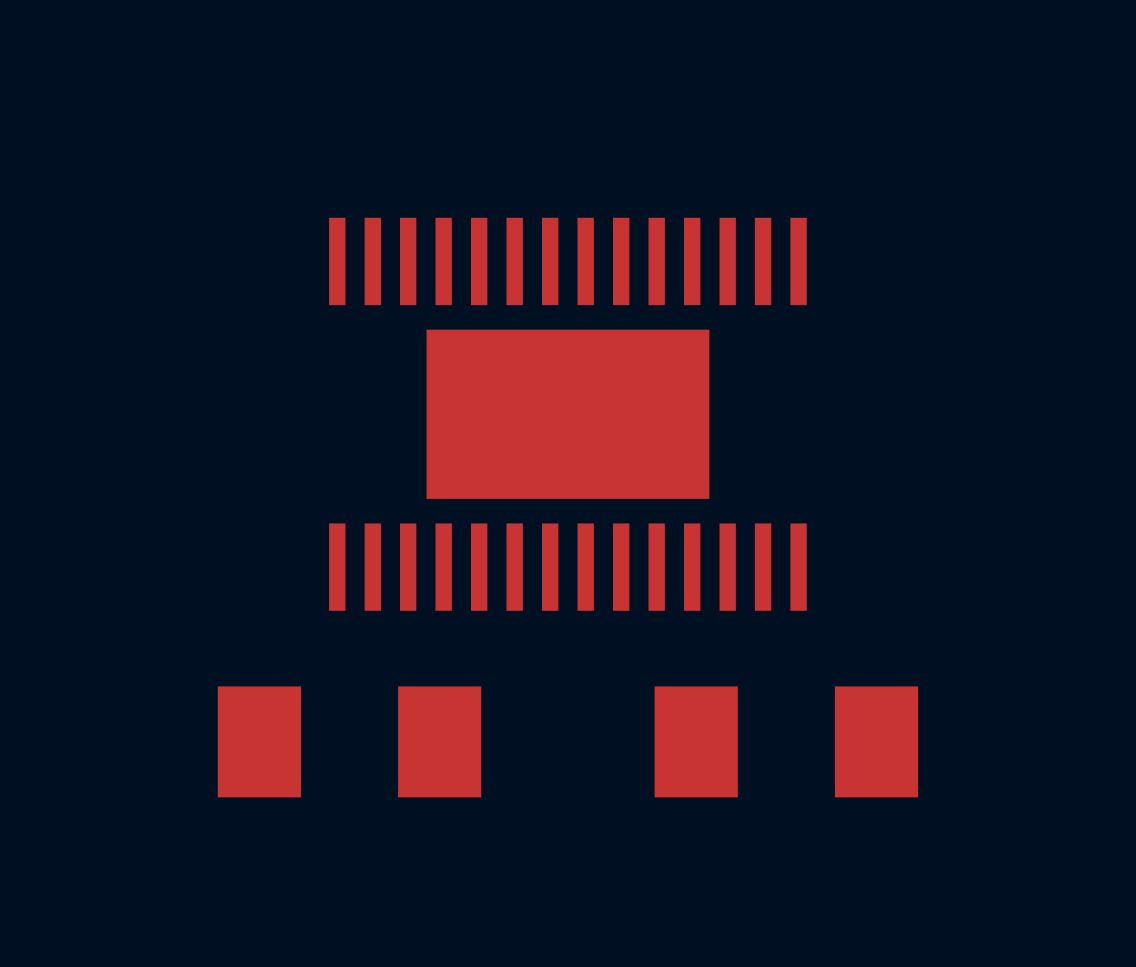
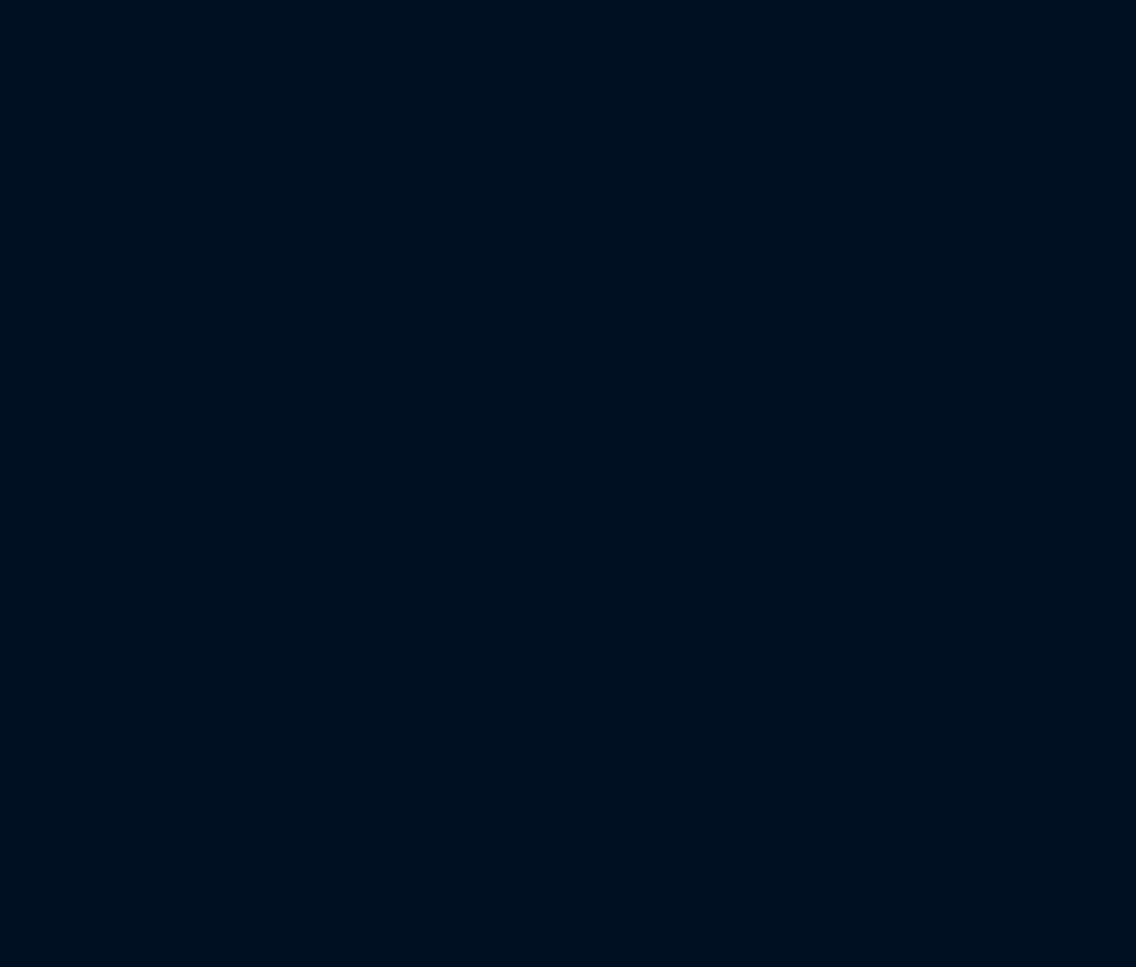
part: (567, 414) -> none
part: (349, 741) -> none
part: (786, 741) -> none

